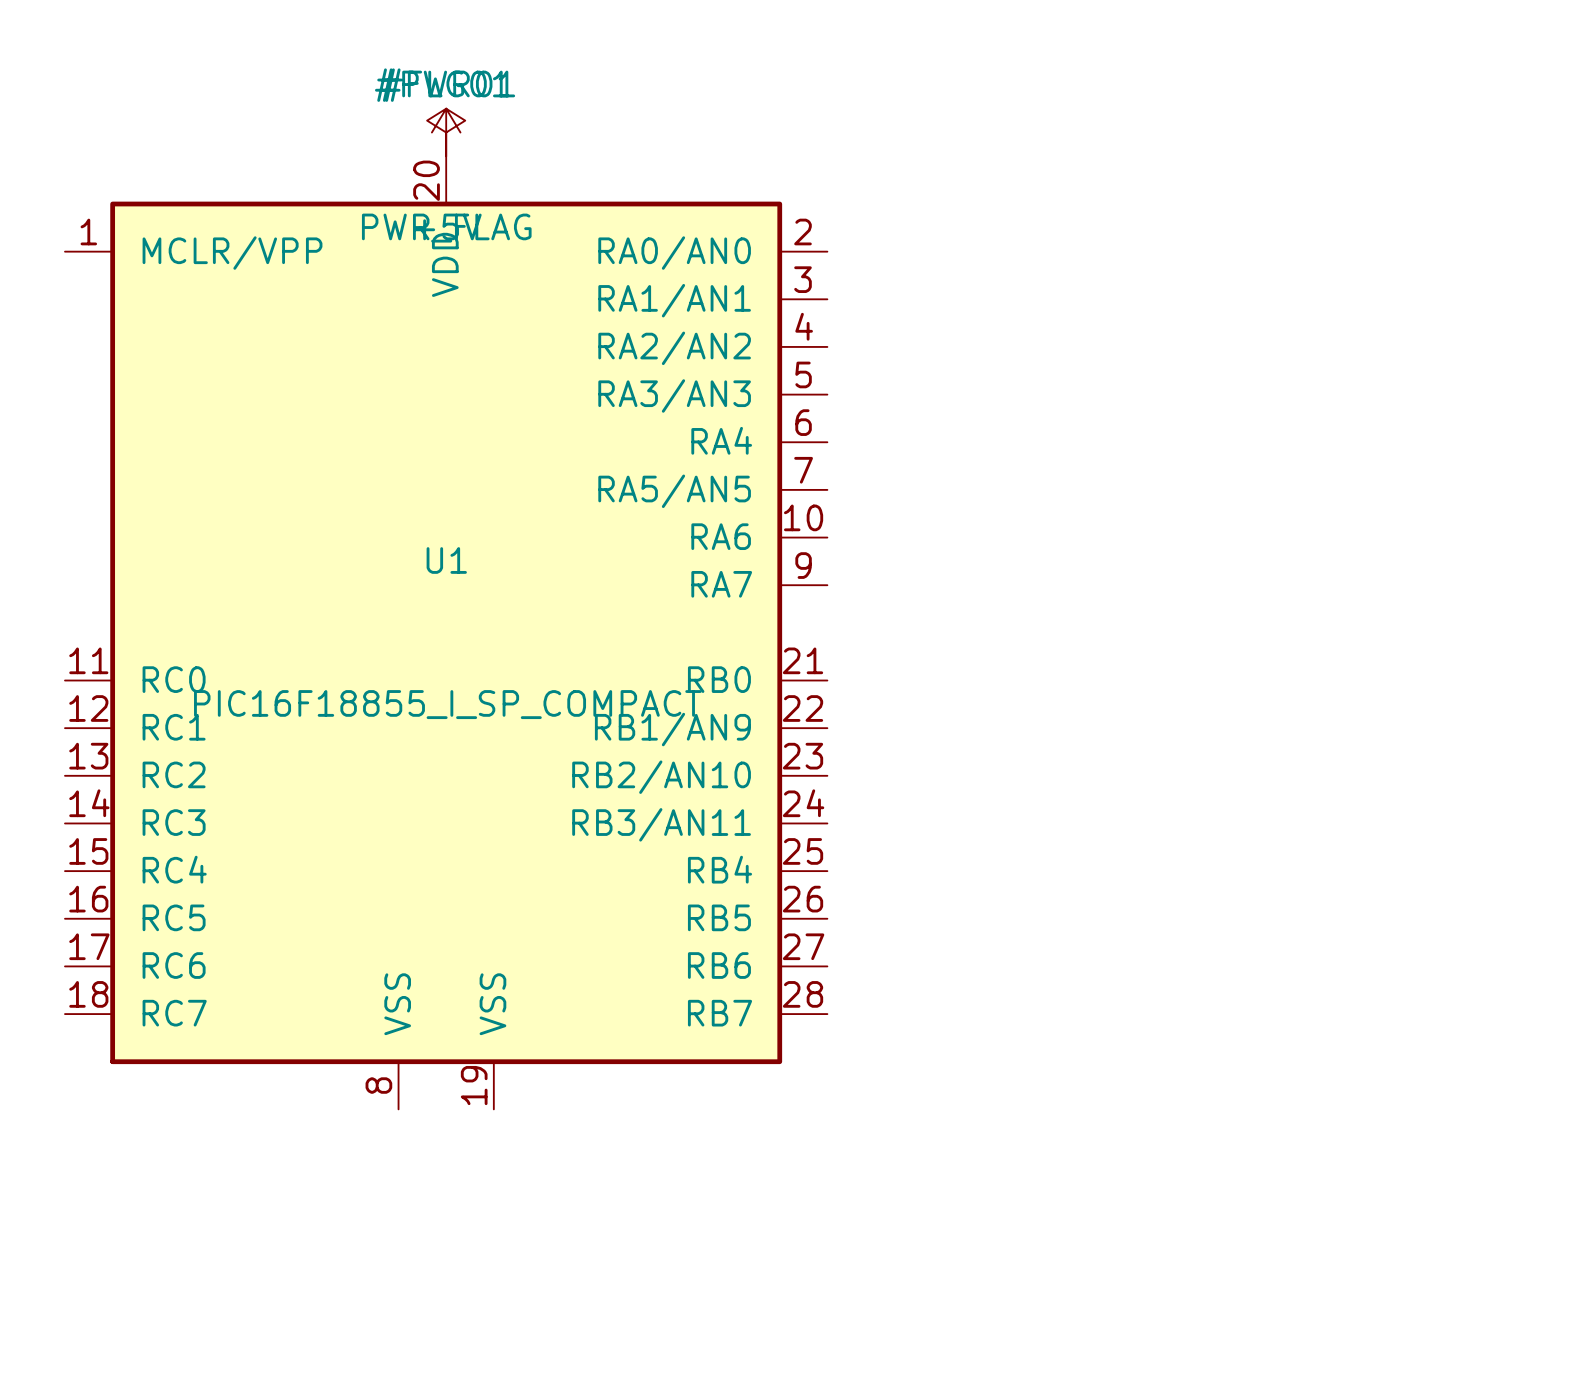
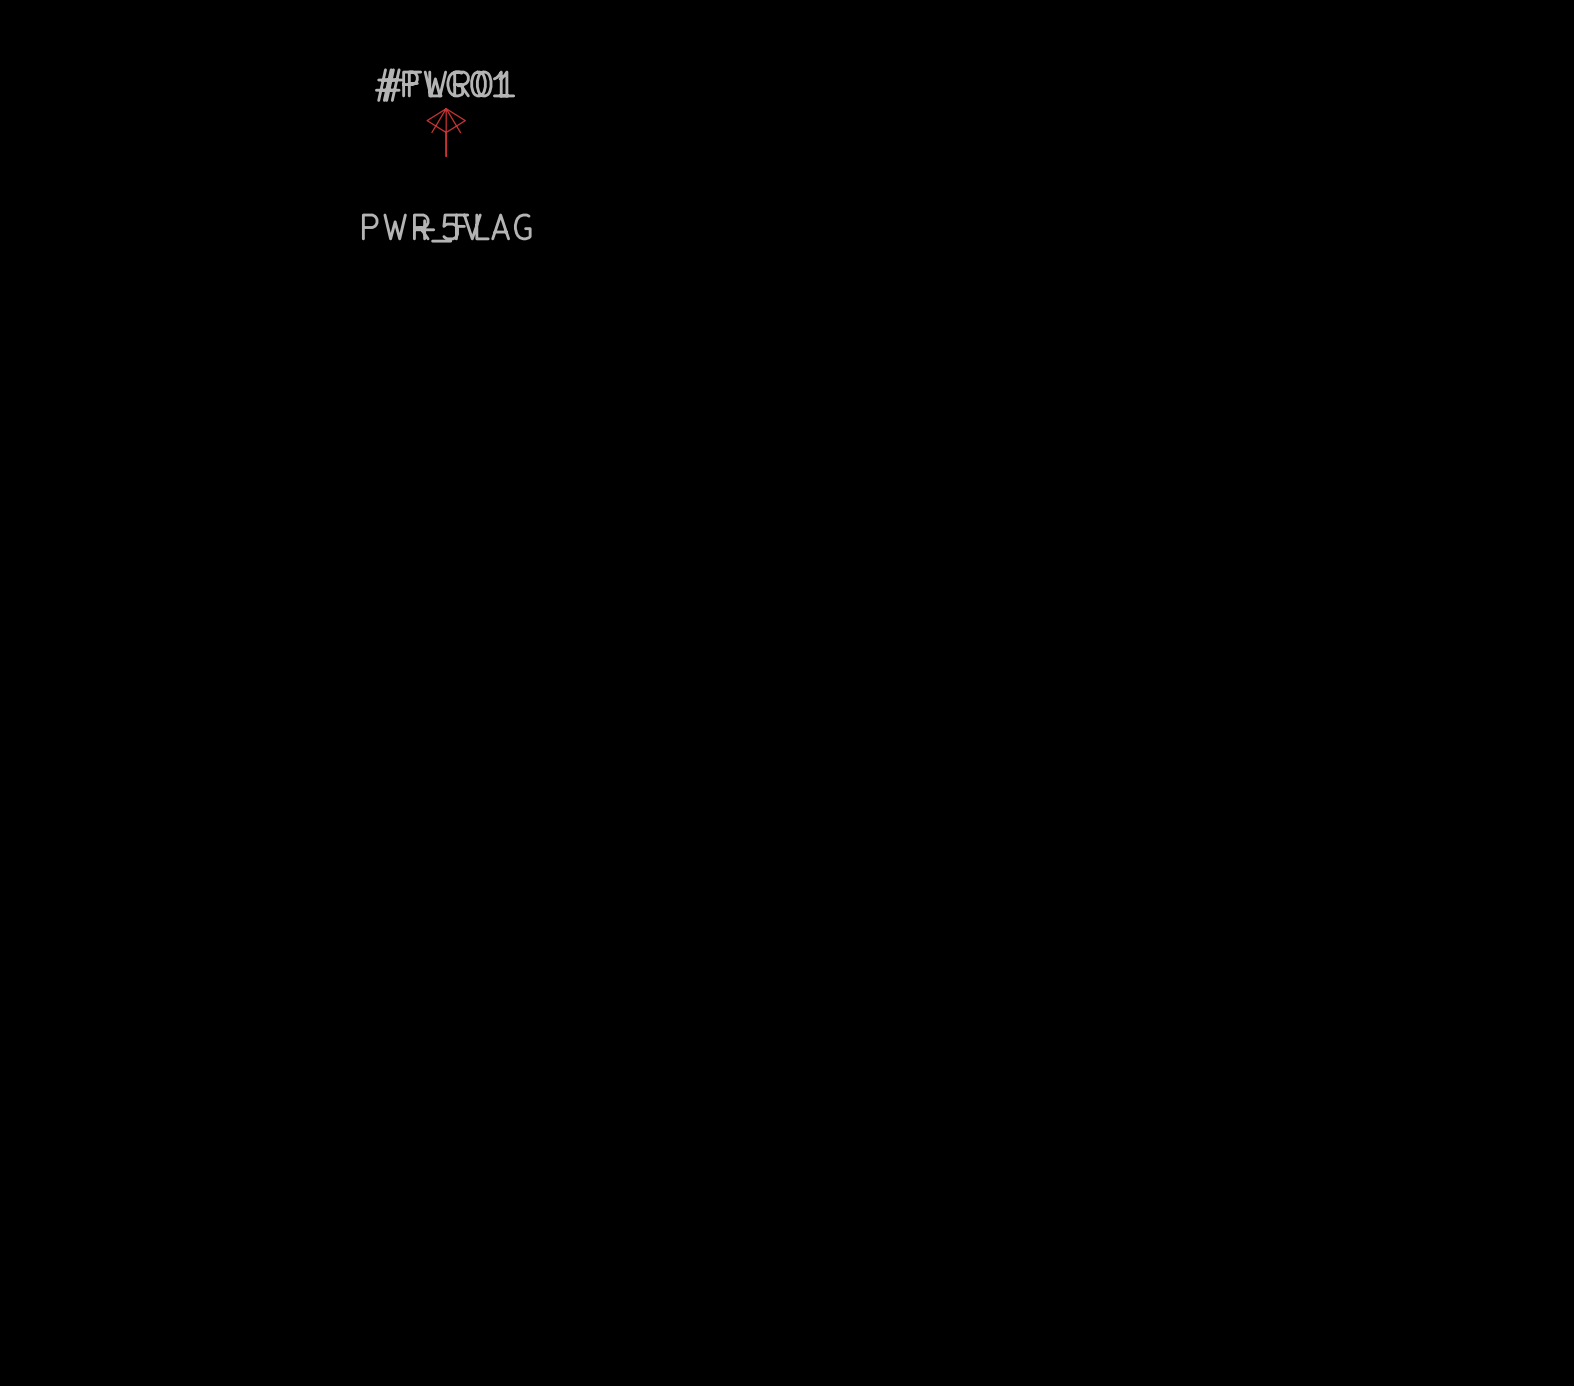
U1: PIC16F18855_I_SP_COMPACT (446, 632) -> none

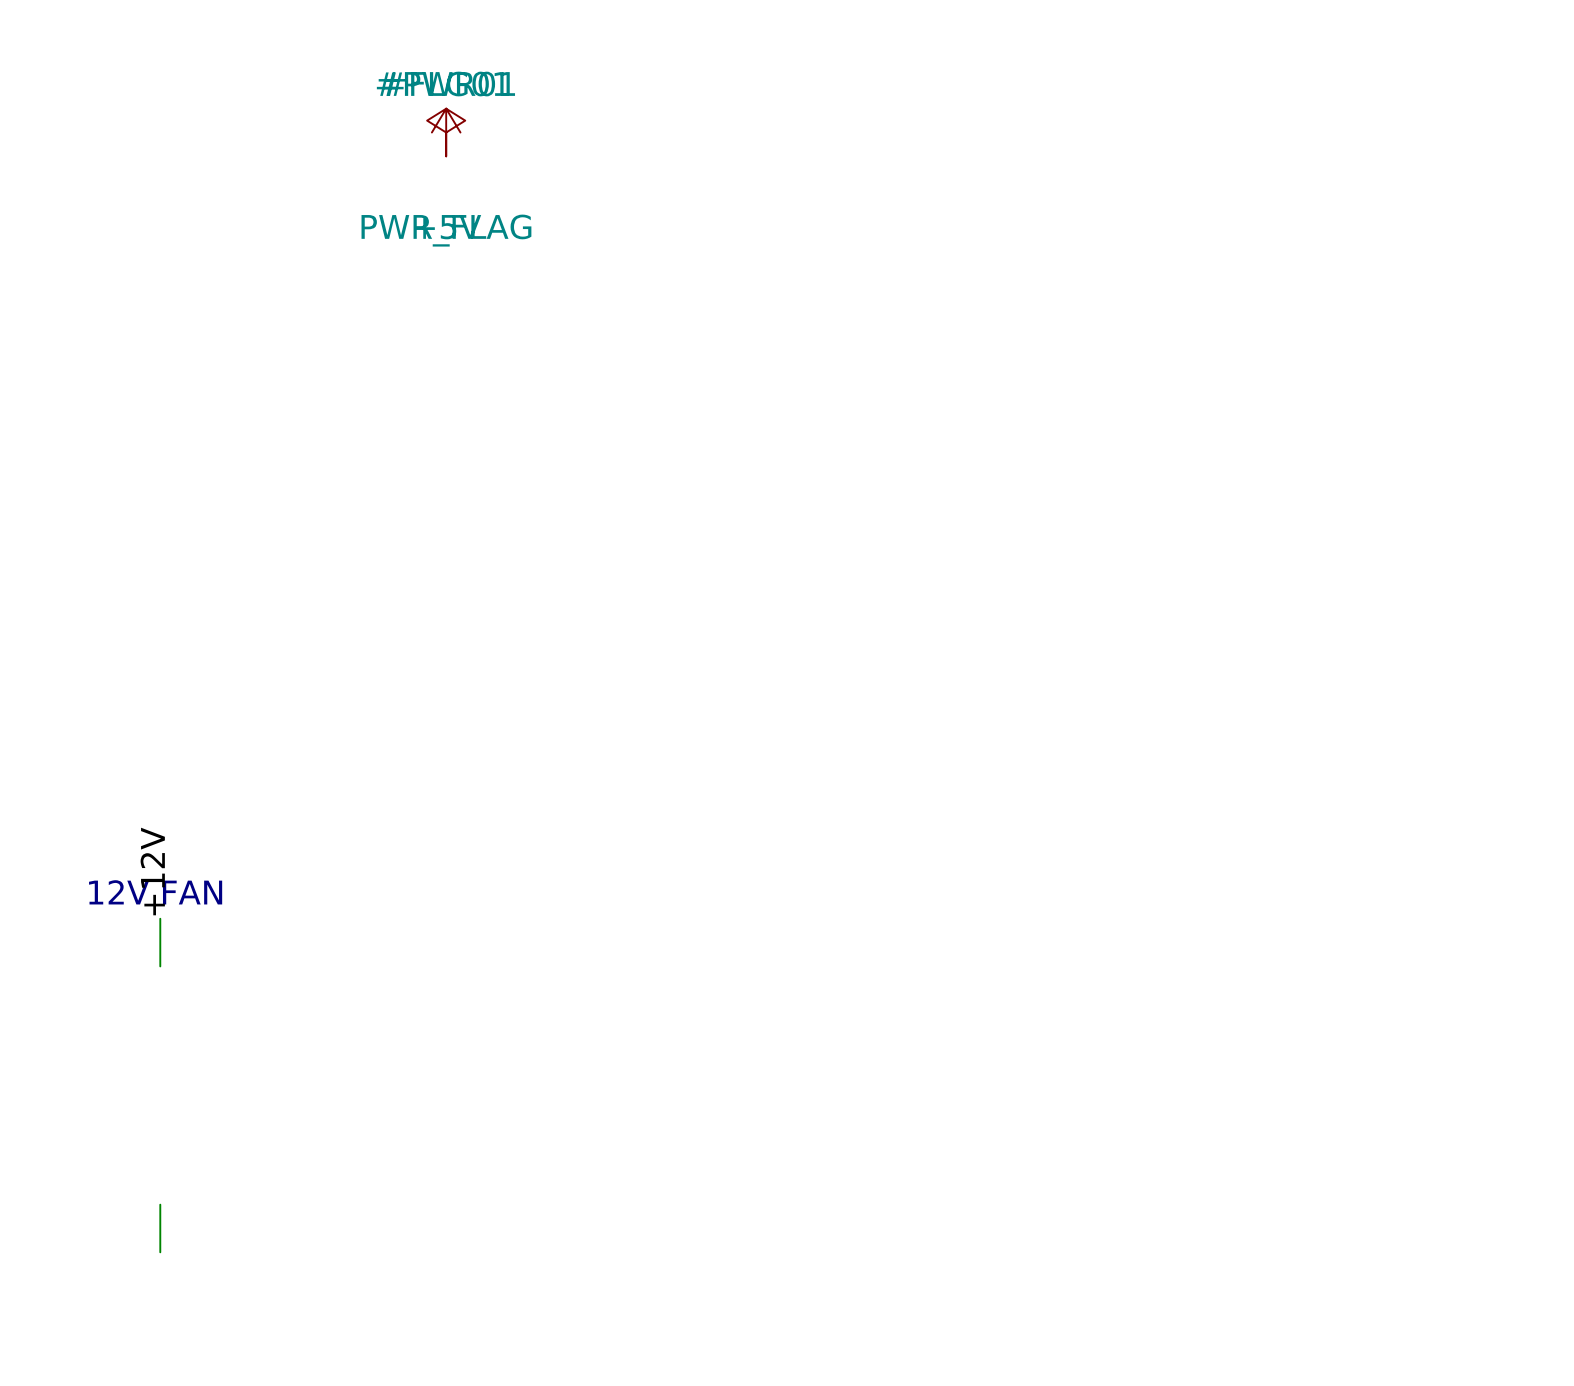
label: none -> +12V (152, 871)
text: none -> 12V FAN (155, 892)
wire: none -> (160, 918) (160, 966)
wire: none -> (160, 1204) (160, 1252)

